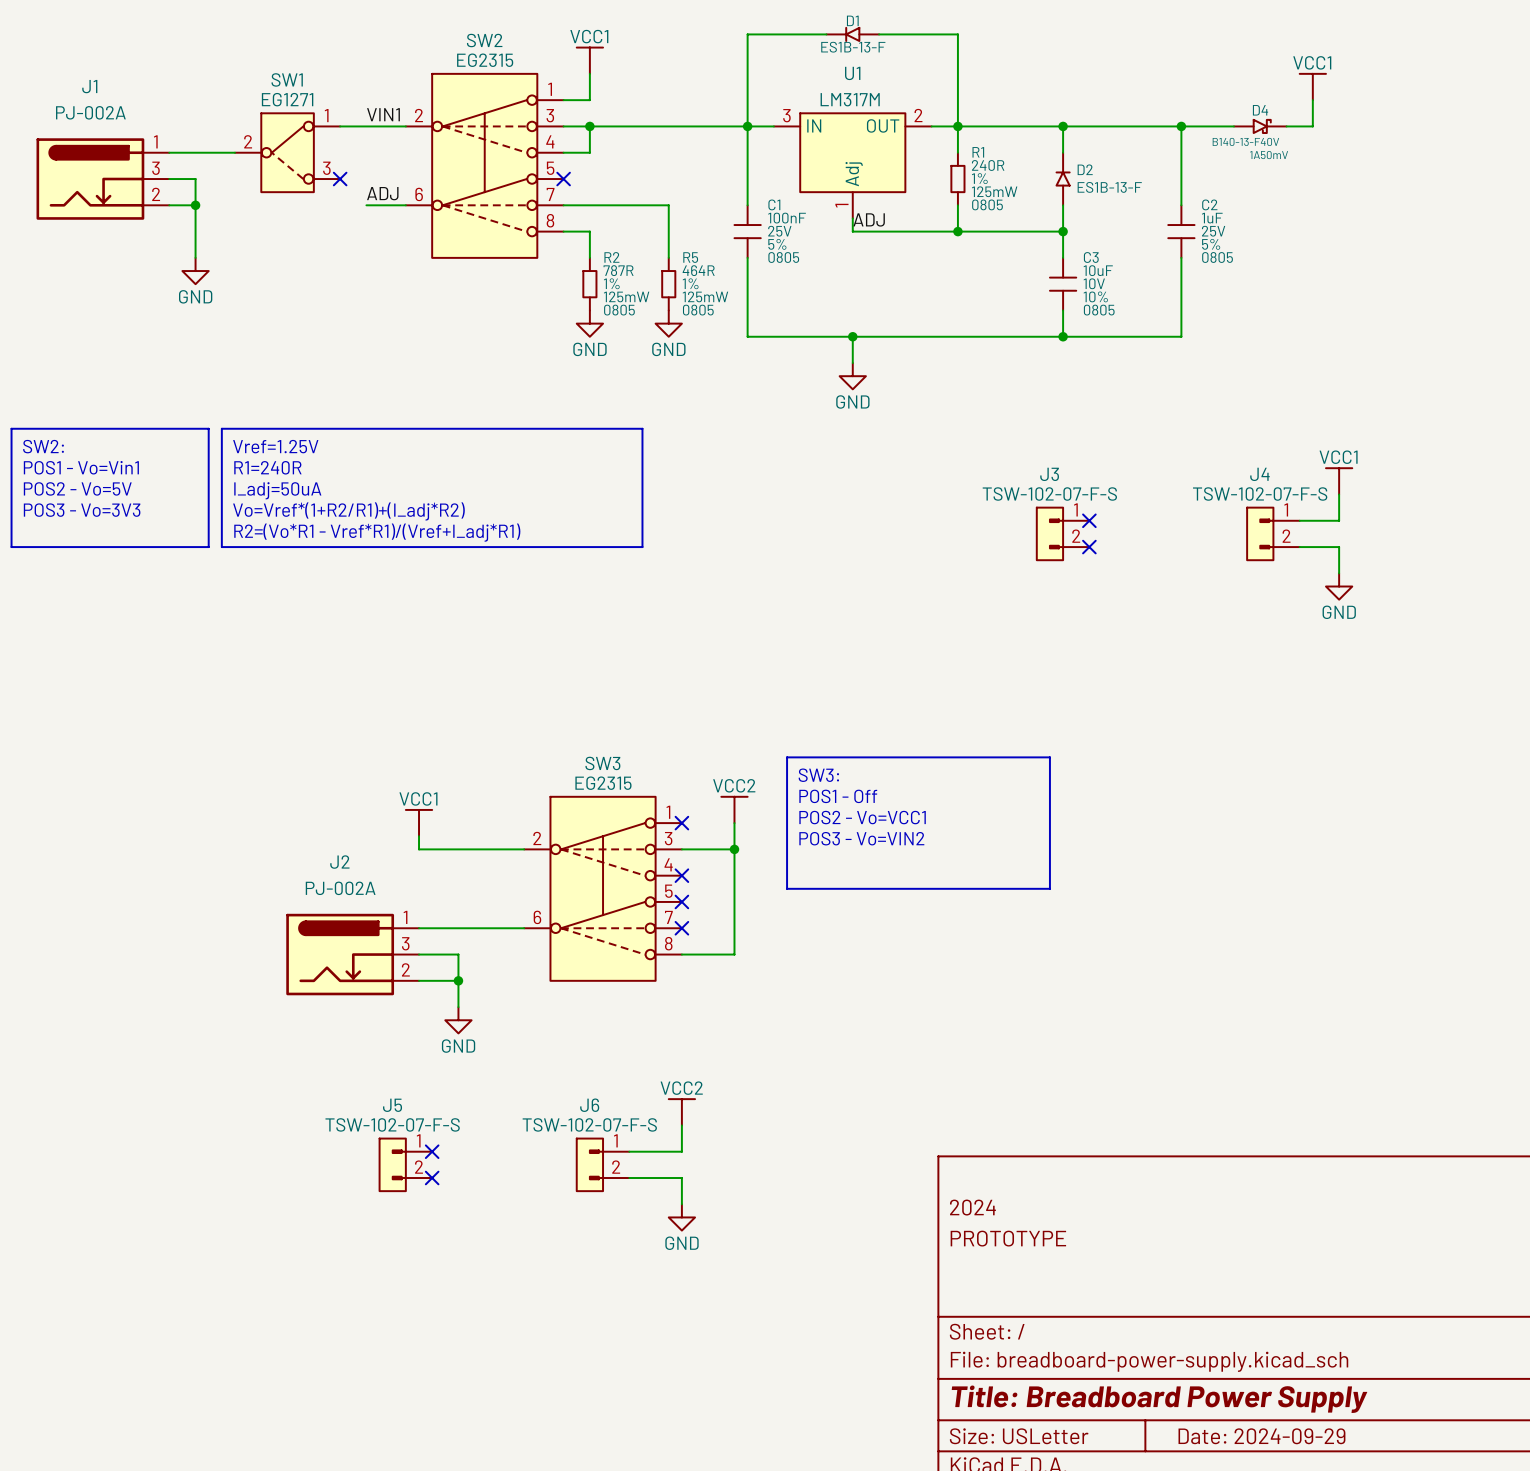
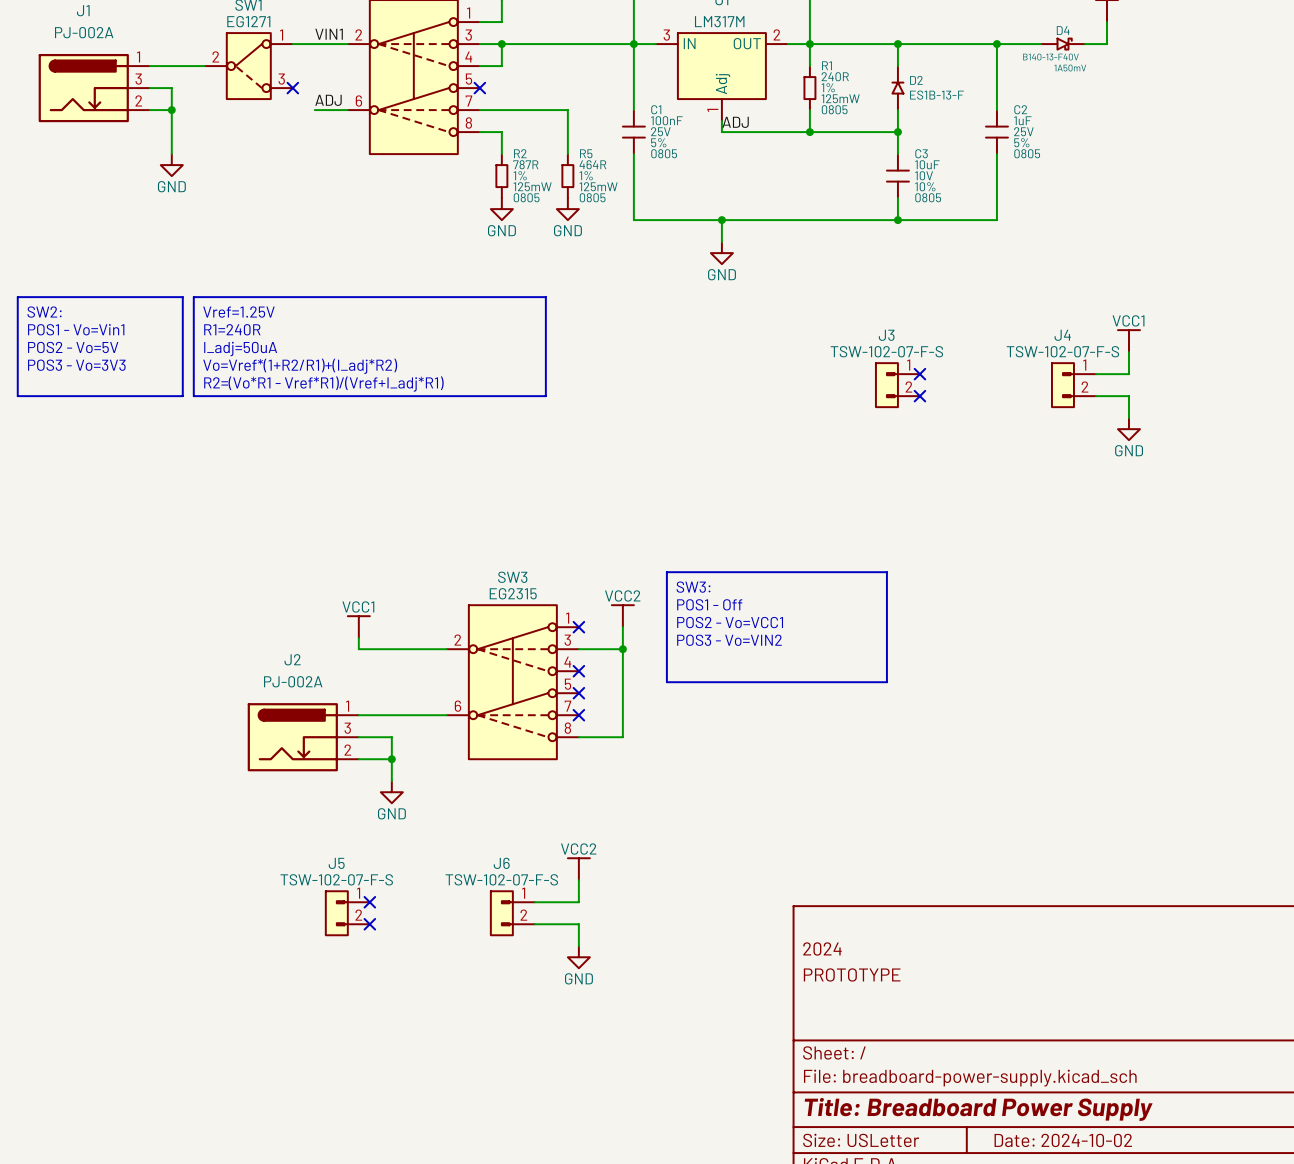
title block: Date: 2024-09-29 (1261, 1436) -> Date: 2024-10-02 (1063, 1140)

